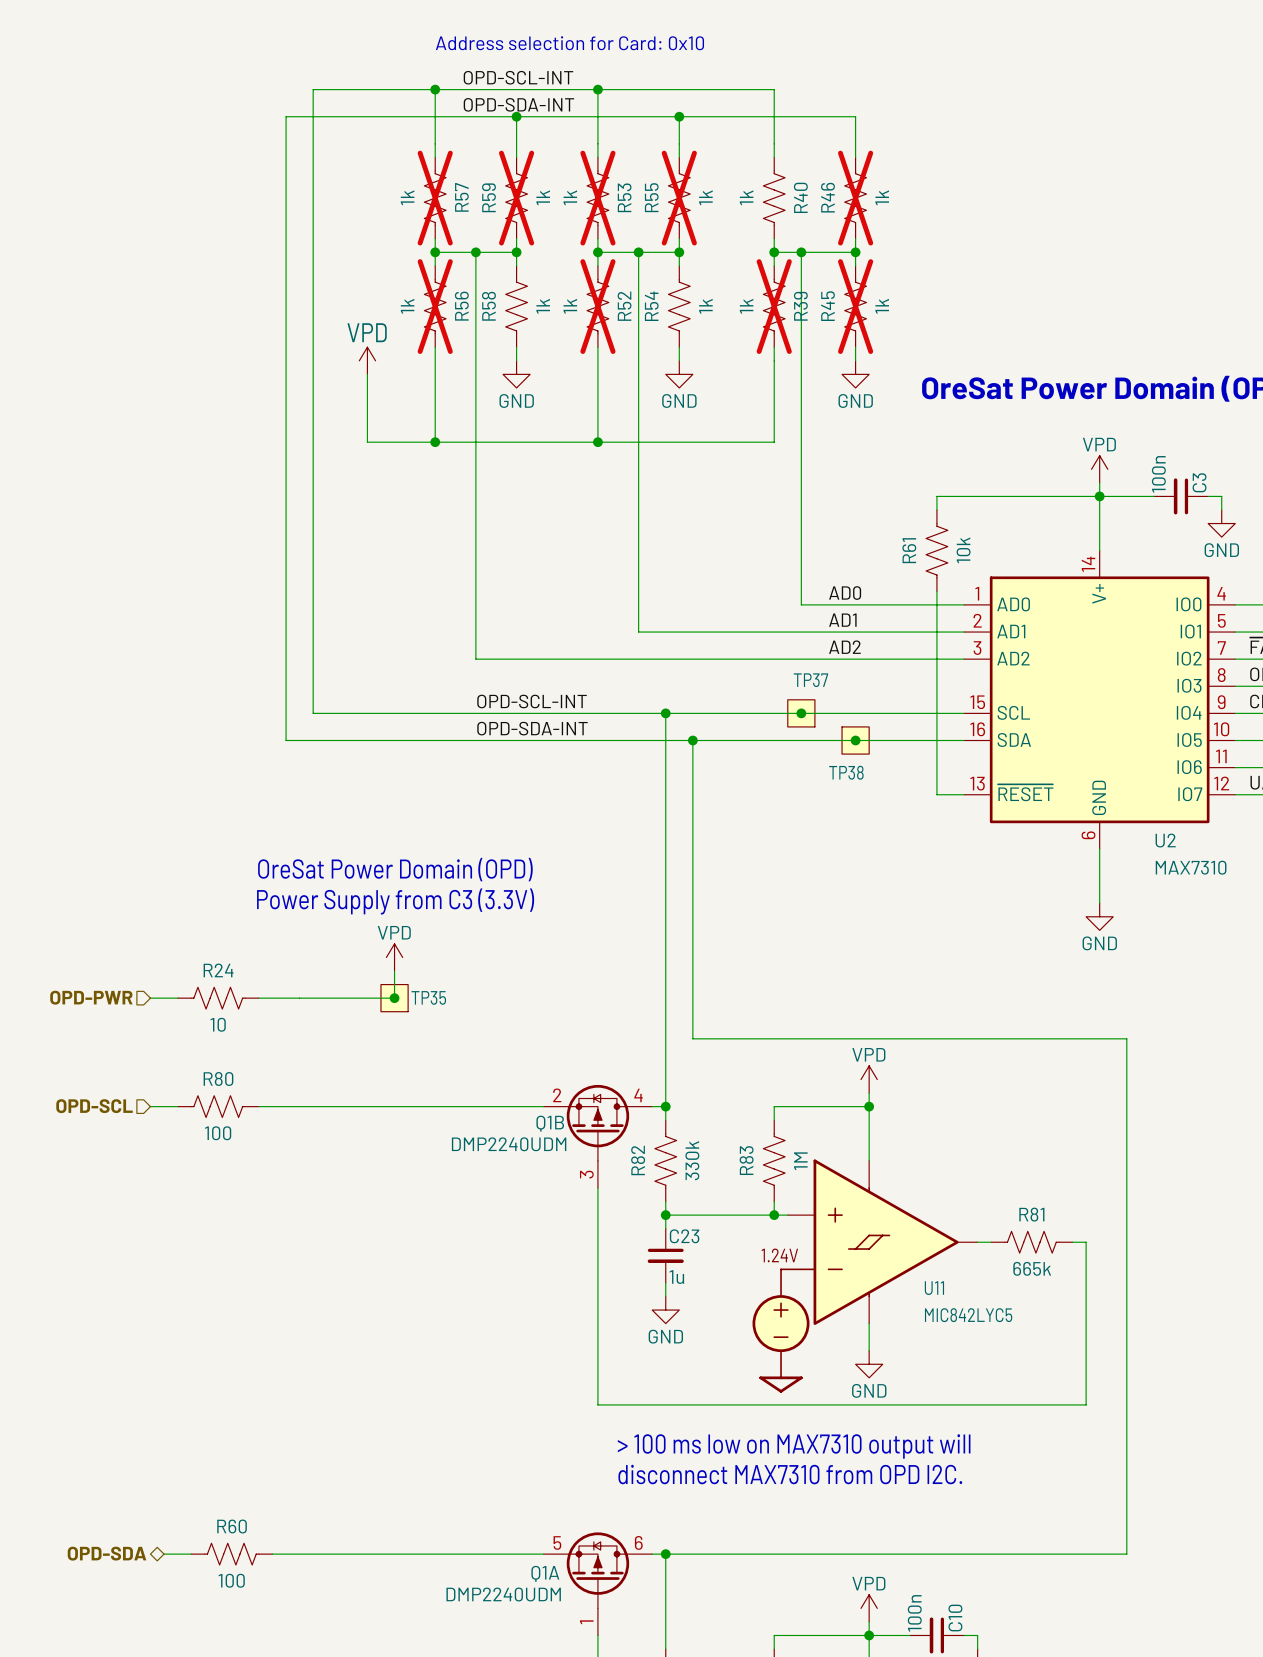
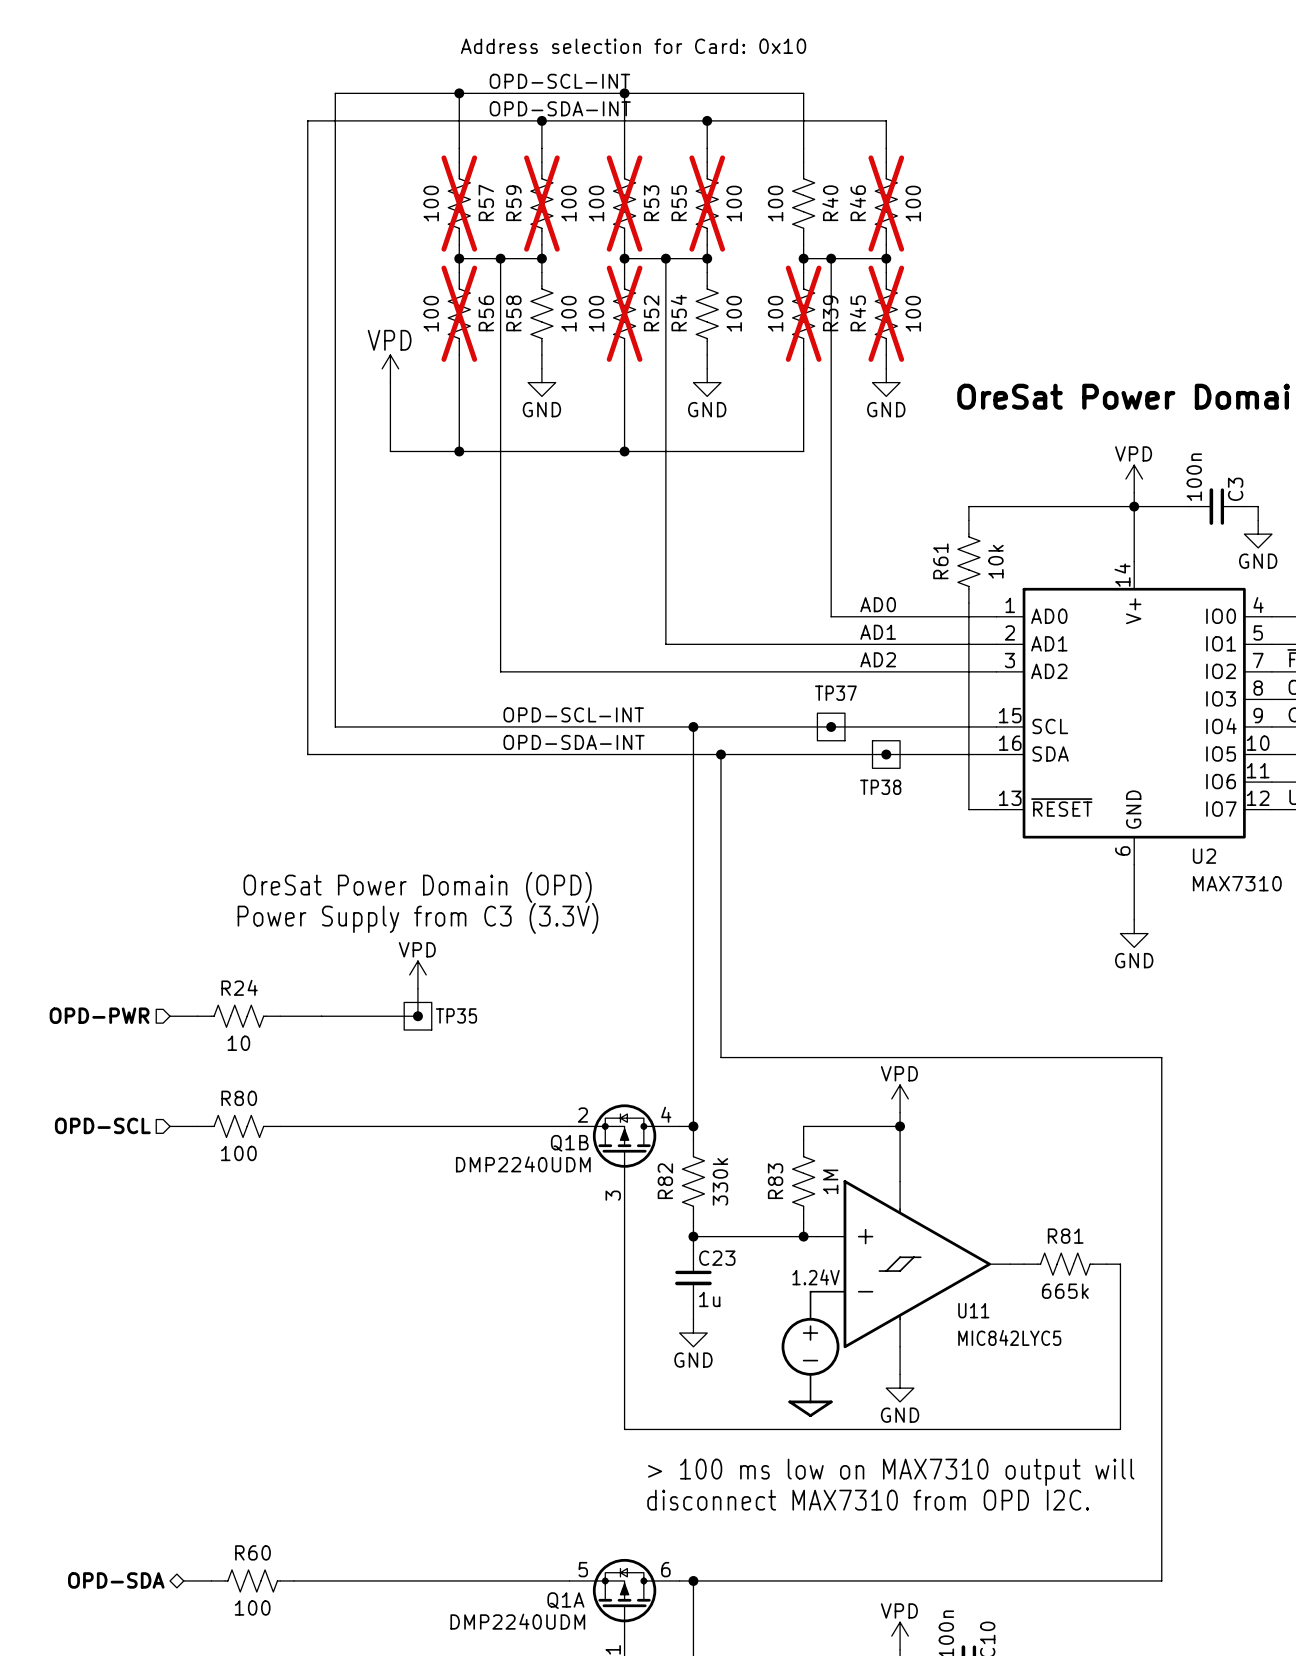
R57 value: 1k (407, 197) -> 100 (431, 203)
R59 value: 1k (543, 197) -> 100 (568, 203)
R53 value: 1k (570, 197) -> 100 (596, 203)
R55 value: 1k (705, 197) -> 100 (734, 203)
R40 value: 1k (746, 197) -> 100 (775, 203)
R46 value: 1k (882, 197) -> 100 (913, 203)
R56 value: 1k (407, 306) -> 100 (431, 313)
R58 value: 1k (543, 306) -> 100 (568, 313)
R52 value: 1k (570, 306) -> 100 (596, 313)
R54 value: 1k (705, 306) -> 100 (734, 313)
R39 value: 1k (746, 306) -> 100 (775, 313)
R45 value: 1k (882, 306) -> 100 (913, 313)

